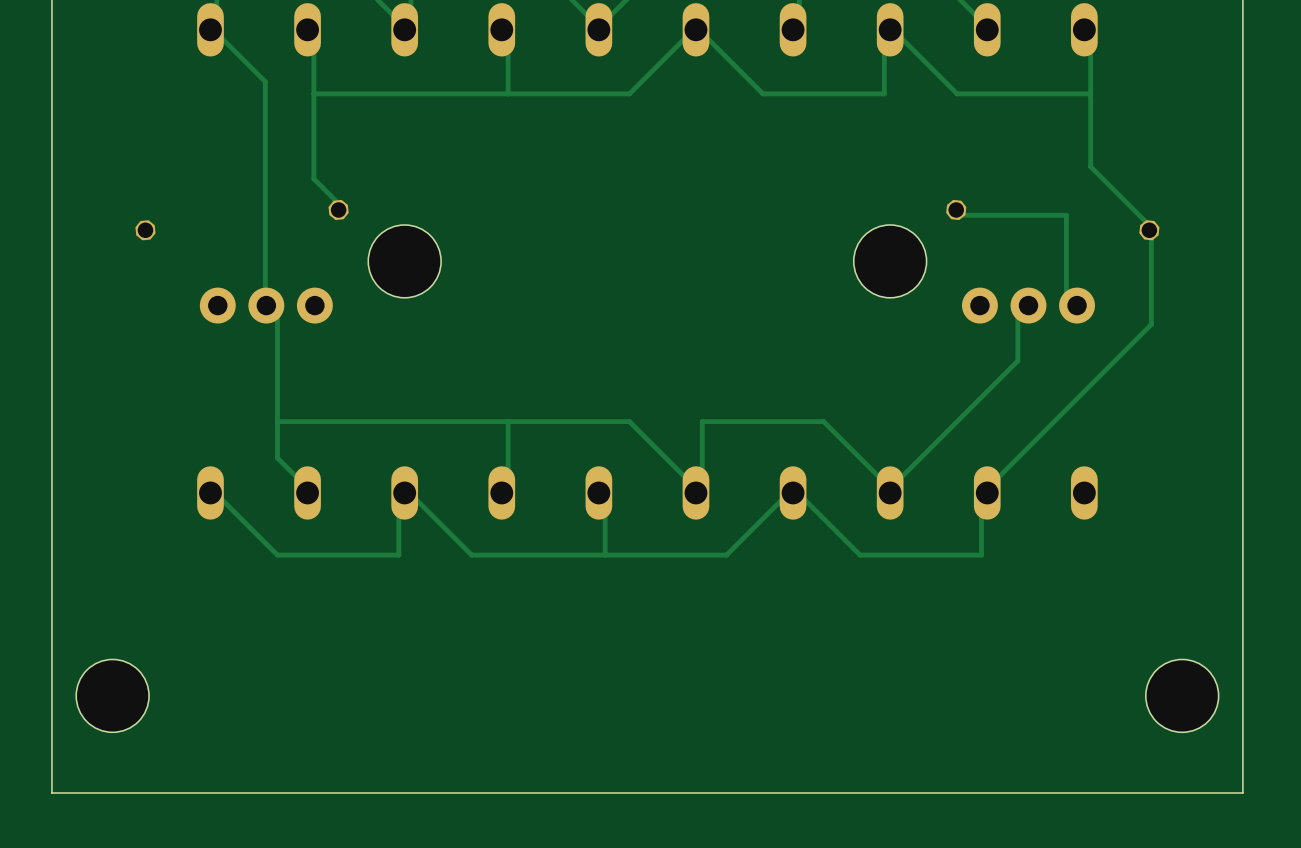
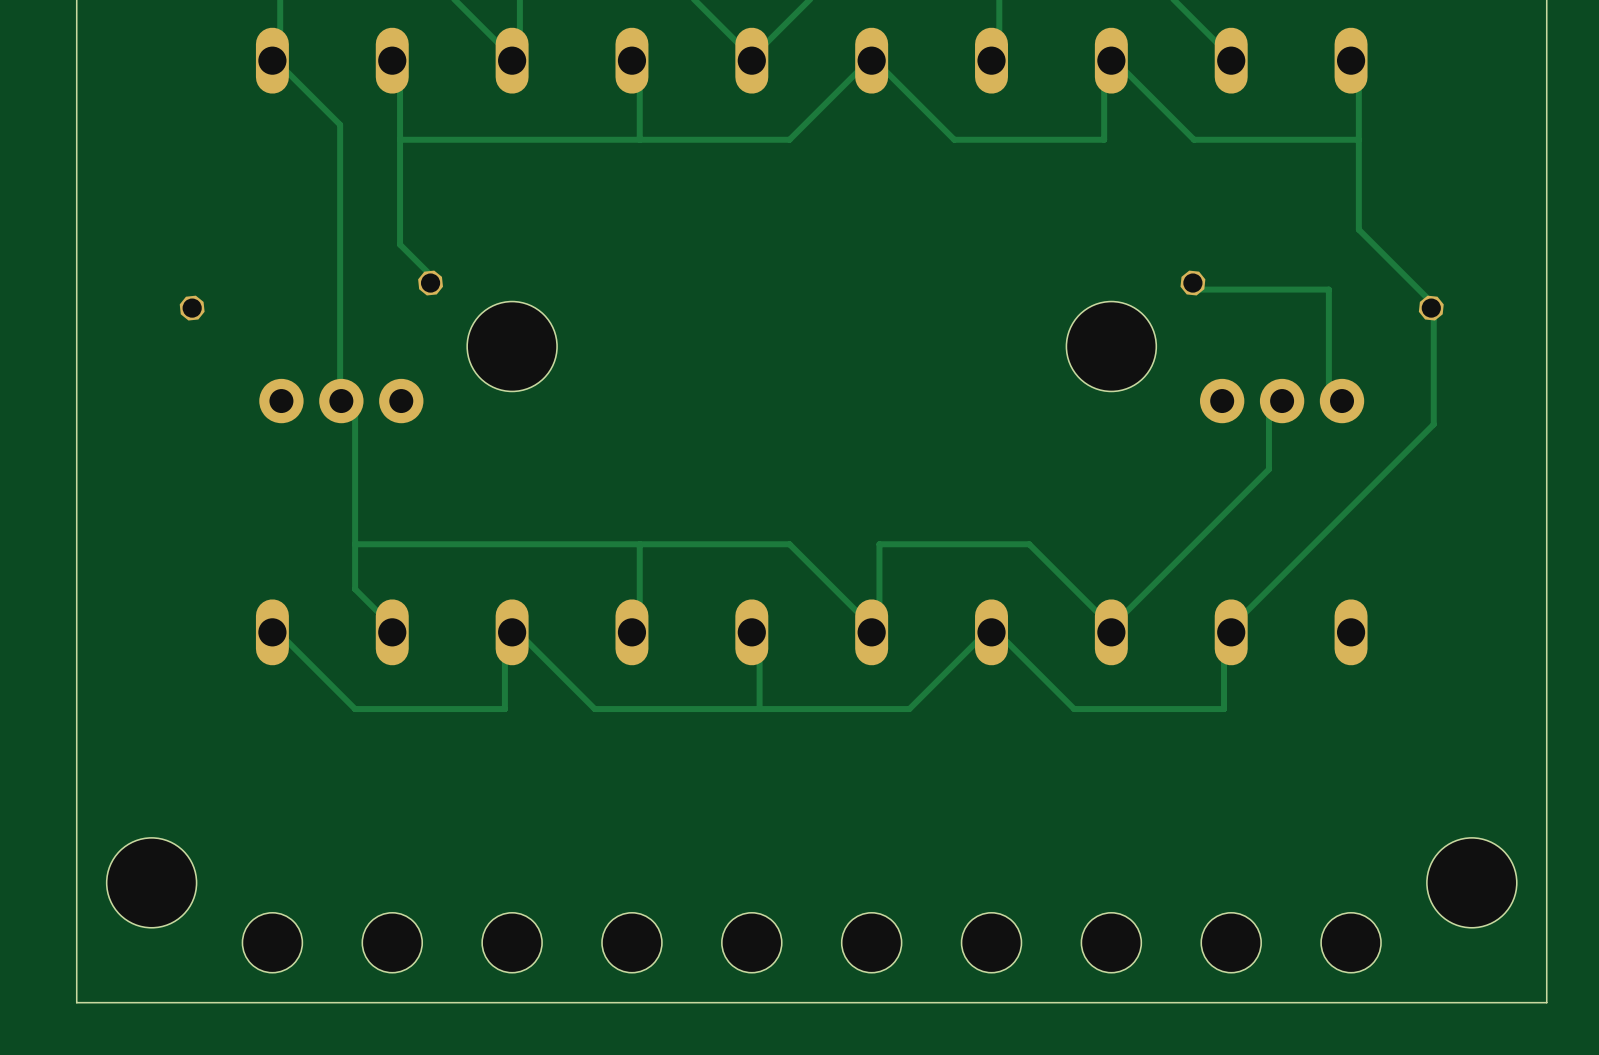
hole: none -> (272, 942)
hole: none -> (392, 942)
hole: none -> (512, 942)
hole: none -> (631, 942)
hole: none -> (751, 942)
hole: none -> (871, 942)
hole: none -> (991, 942)
hole: none -> (1111, 942)
hole: none -> (1231, 942)
hole: none -> (1351, 942)

